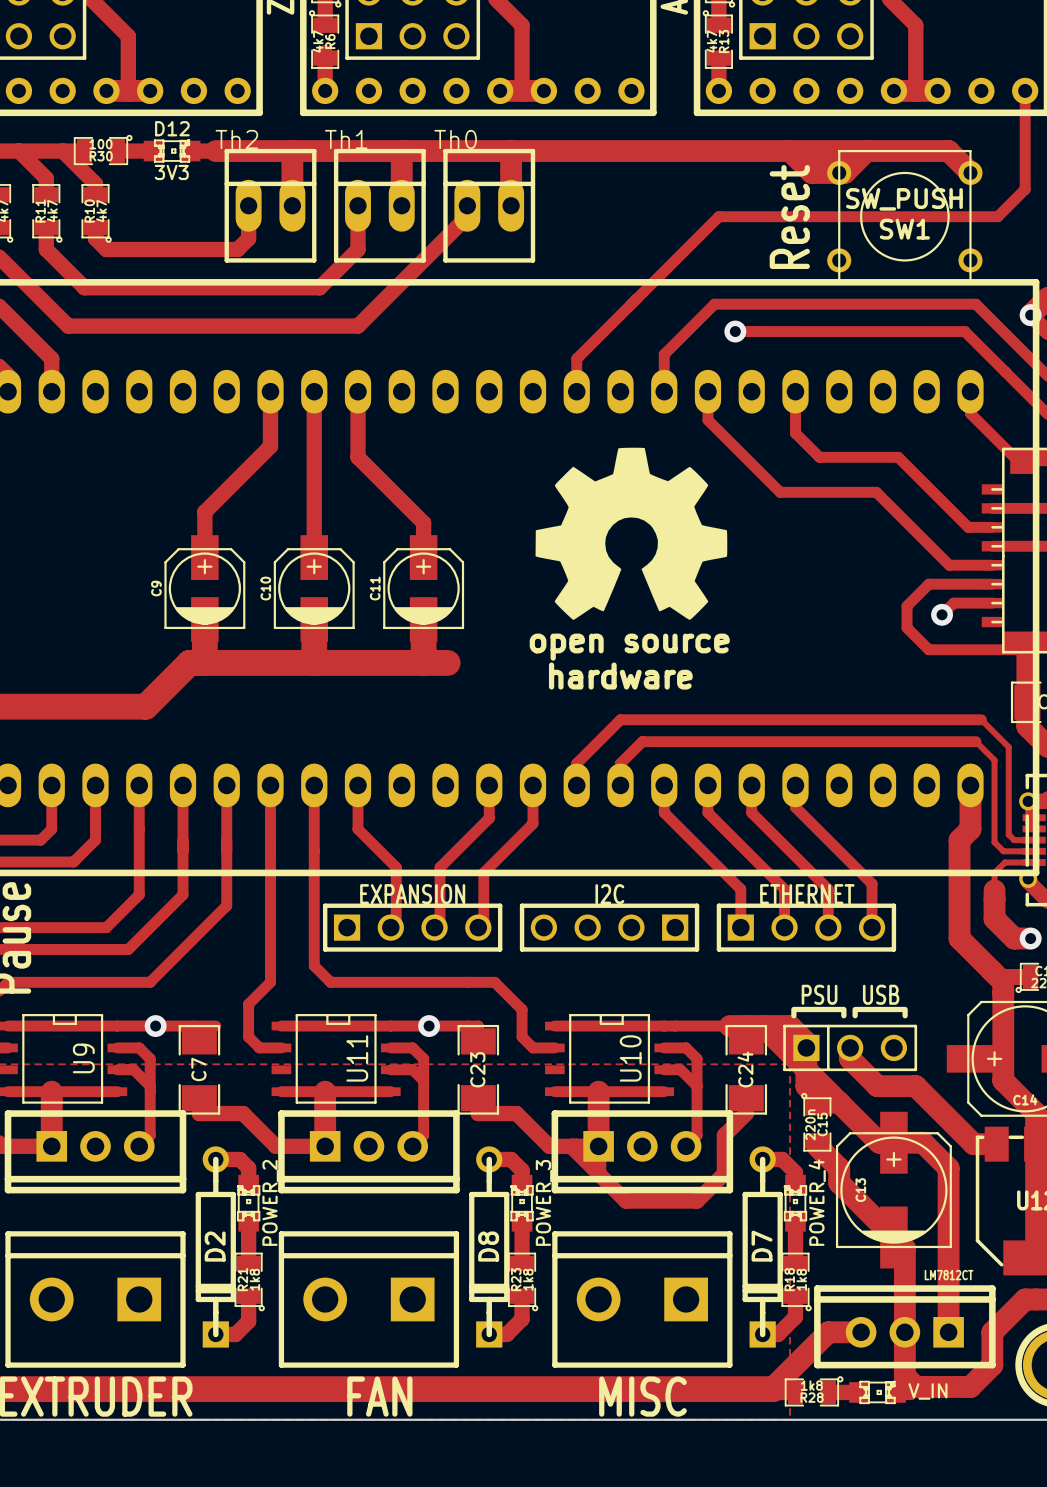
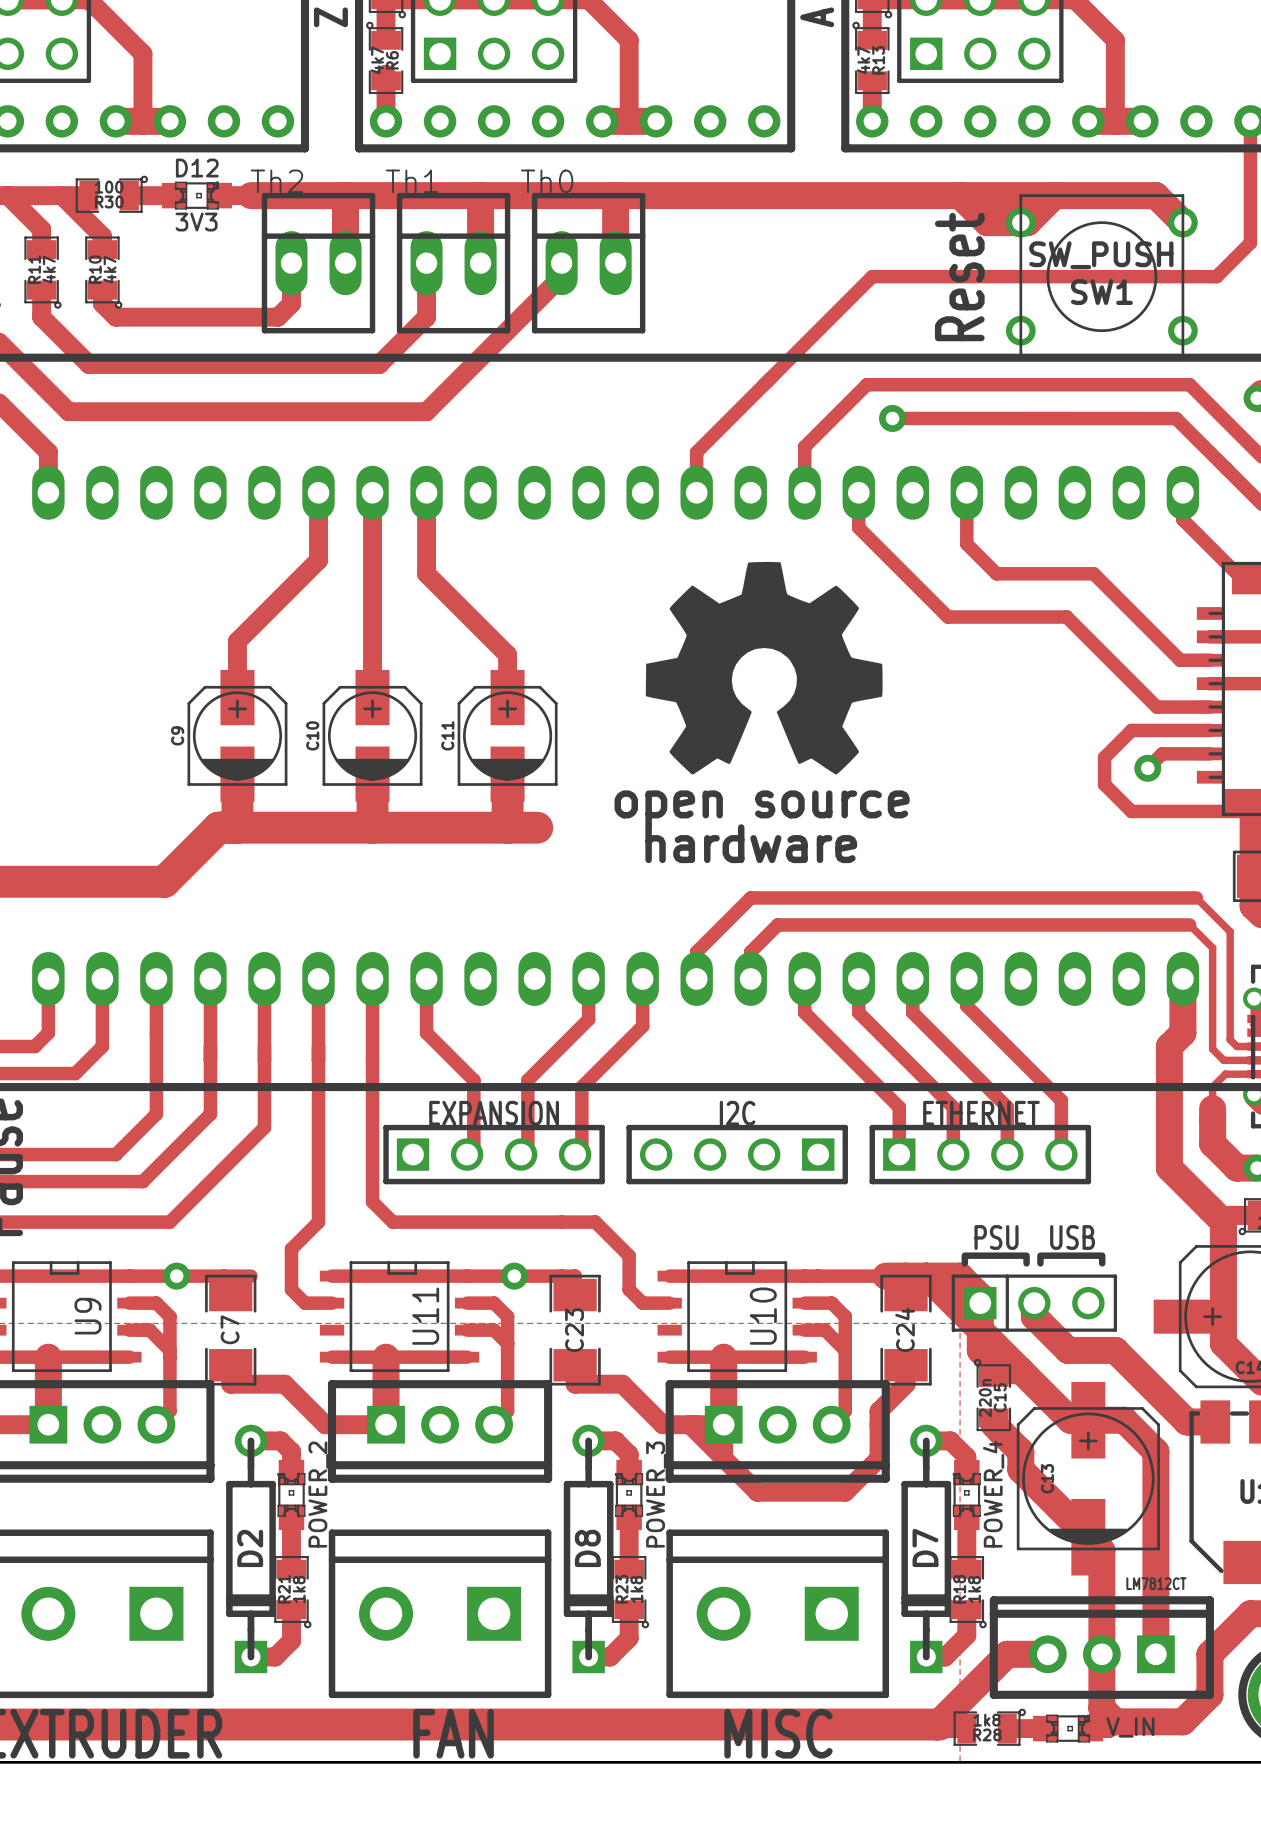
drawing shape: [529, 447, 730, 690] -> [614, 561, 910, 864]

